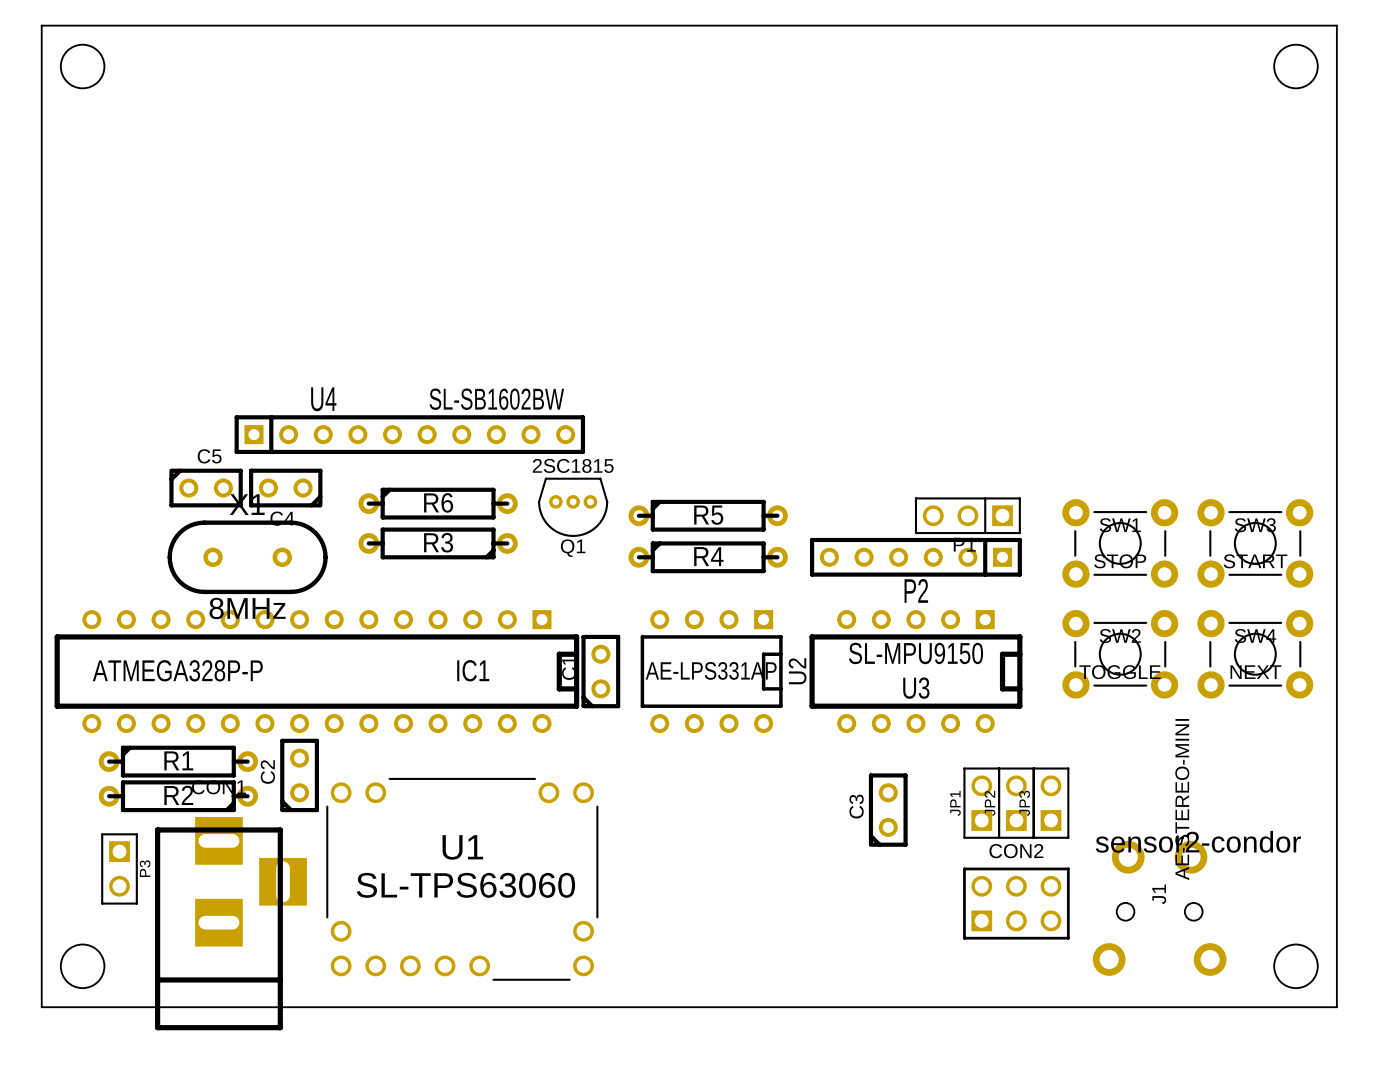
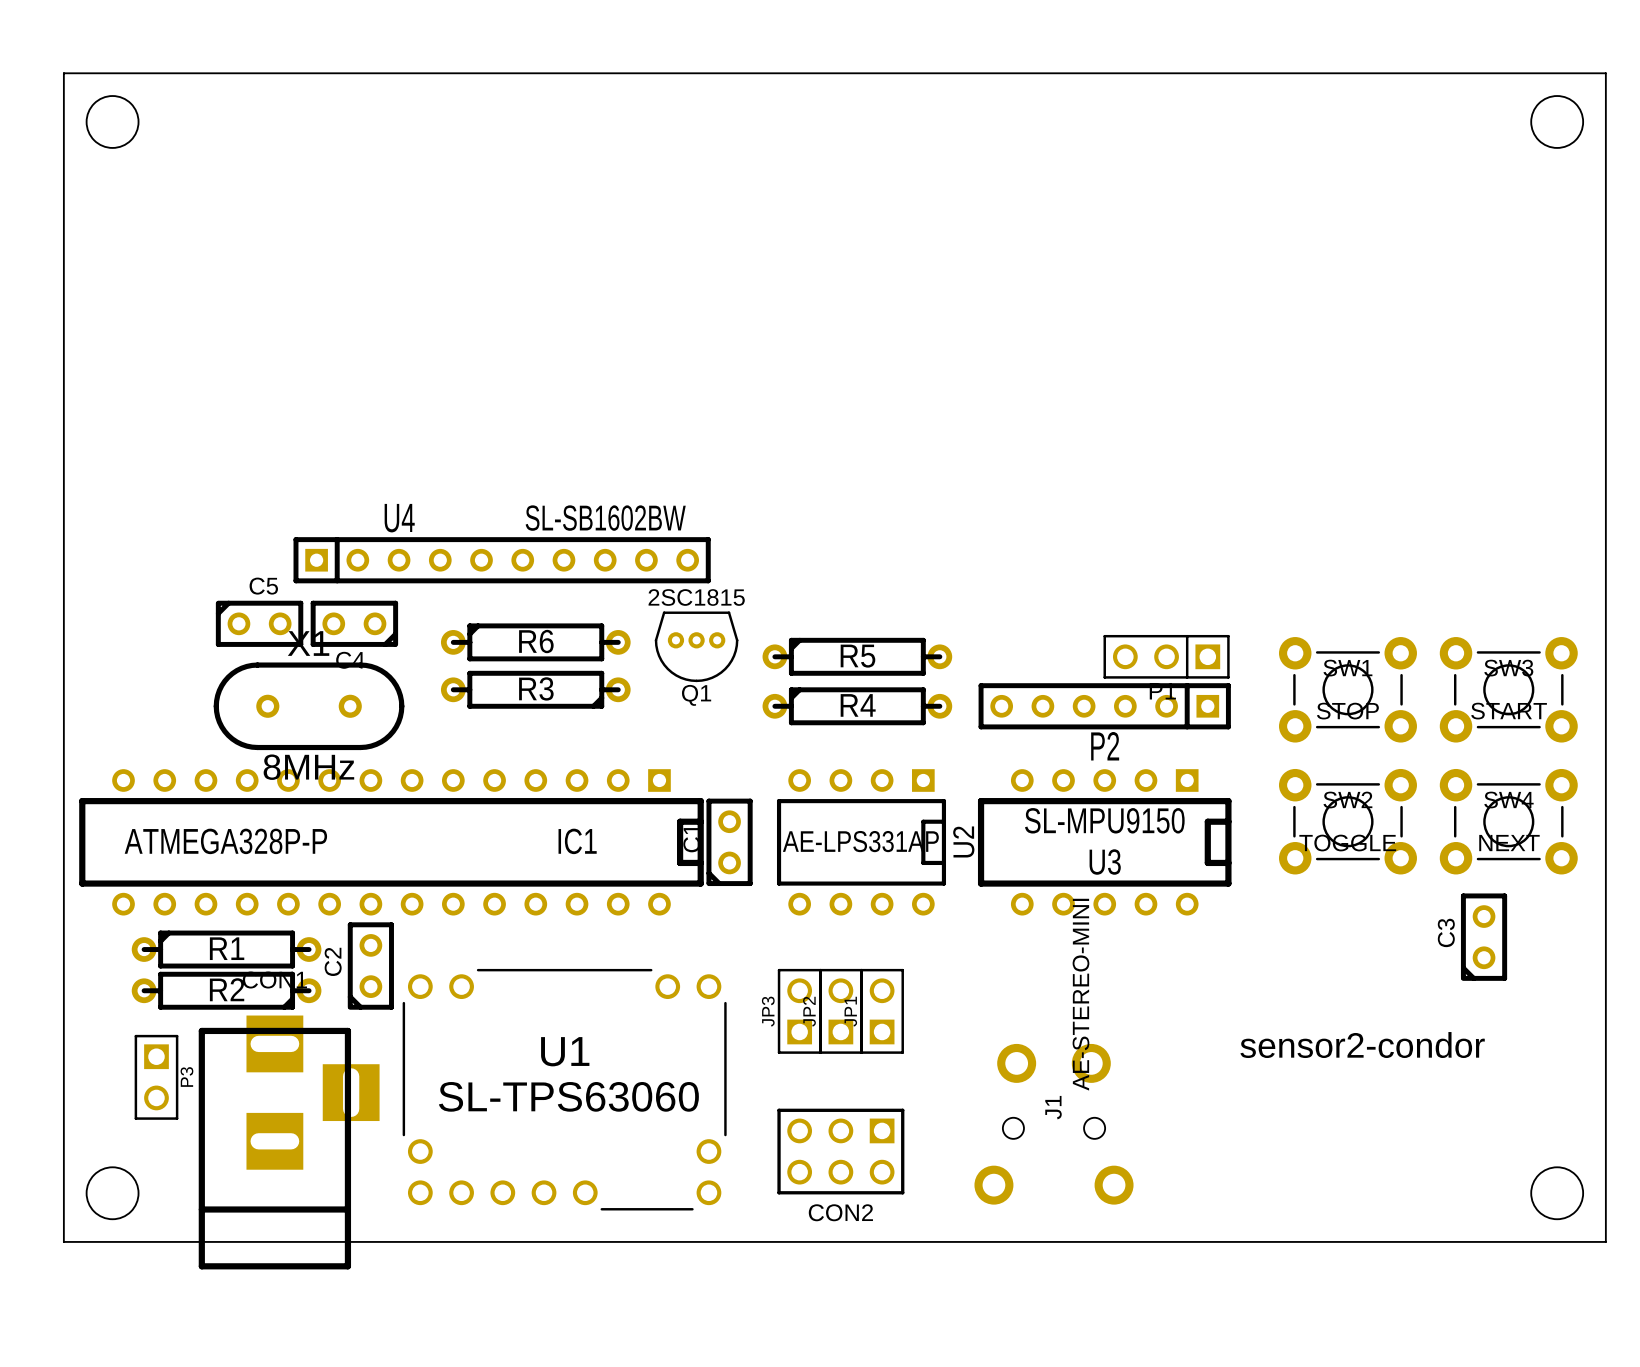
JP1 position: (981, 803) -> (882, 1011)
JP2 position: (1016, 803) -> (840, 1011)
JP3 position: (1051, 803) -> (799, 1011)
C3 position: (888, 810) -> (1484, 937)
text position: sensor2-condor (1198, 841) -> sensor2-condor (1362, 1045)
CON2 rotation: 0° (1016, 903) -> 180° (840, 1151)
CON2 position: (1016, 903) -> (840, 1151)
J1 position: (1159, 908) -> (1054, 1124)

